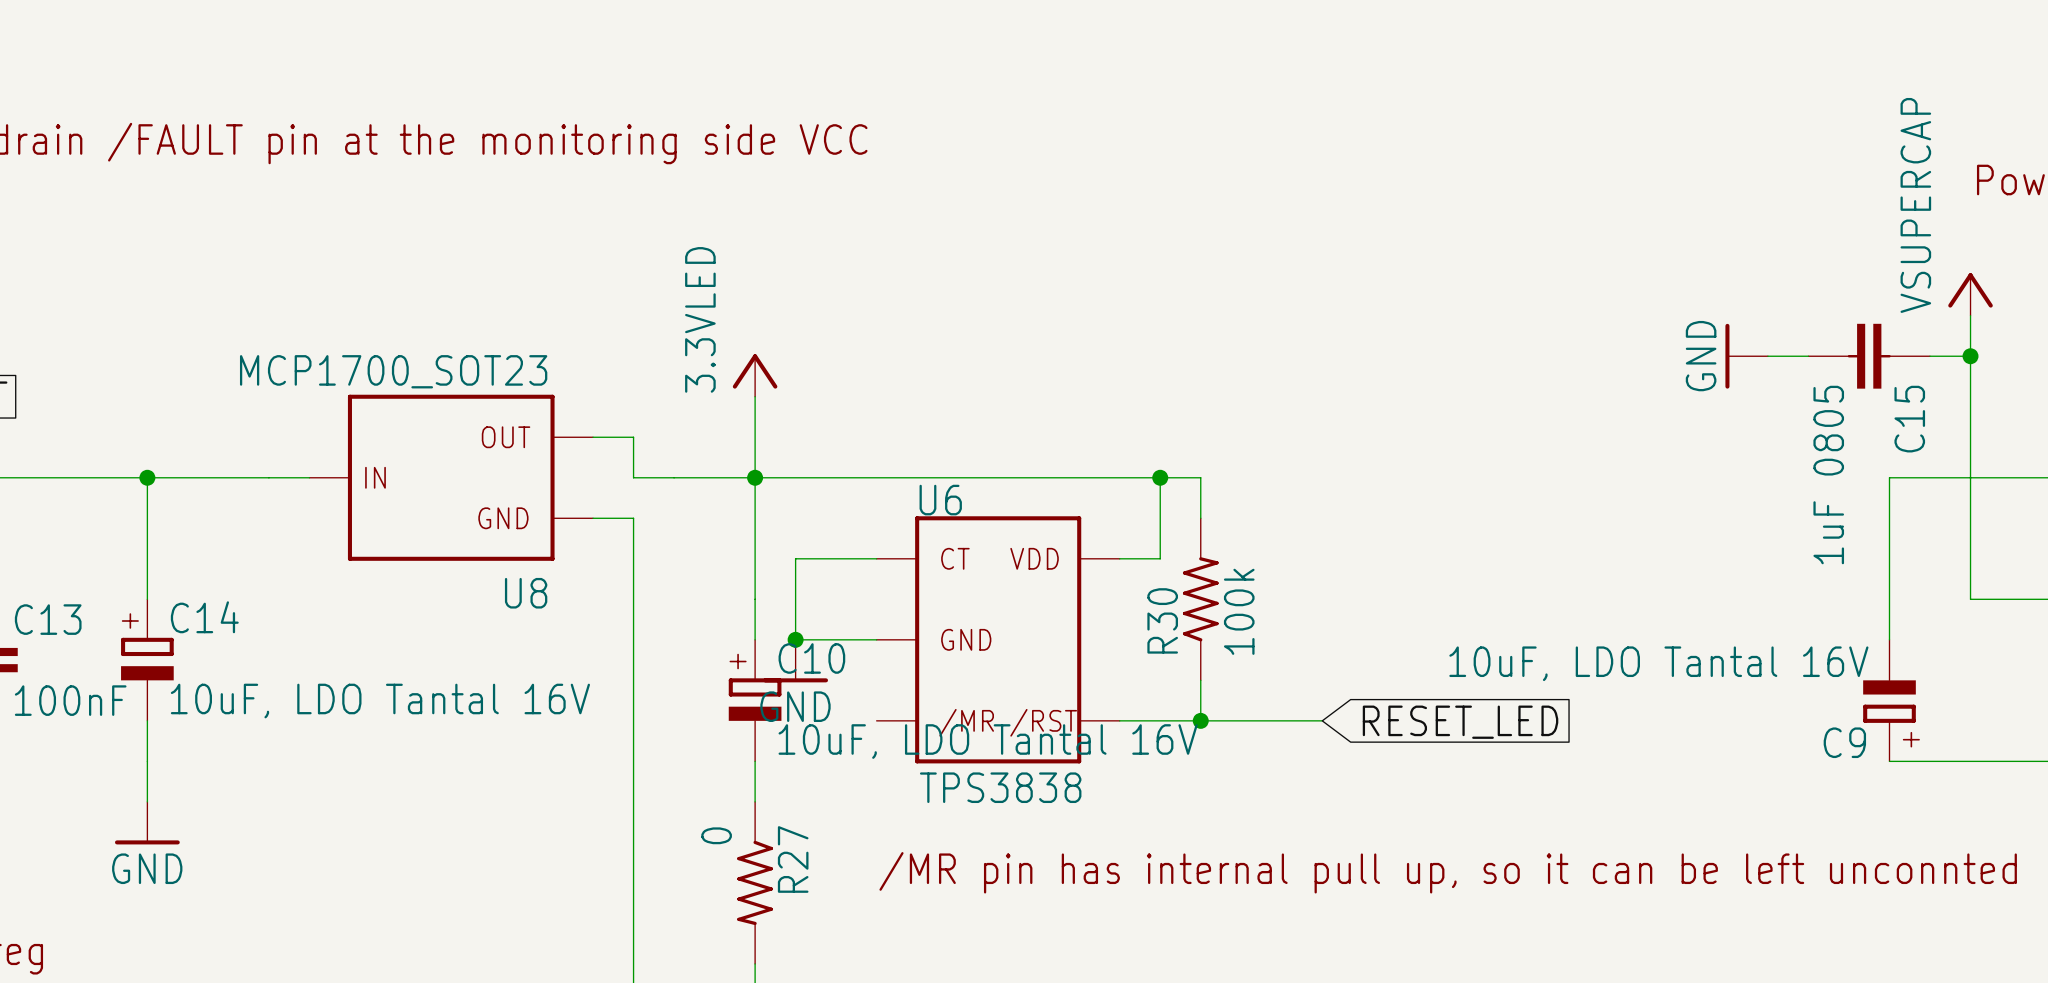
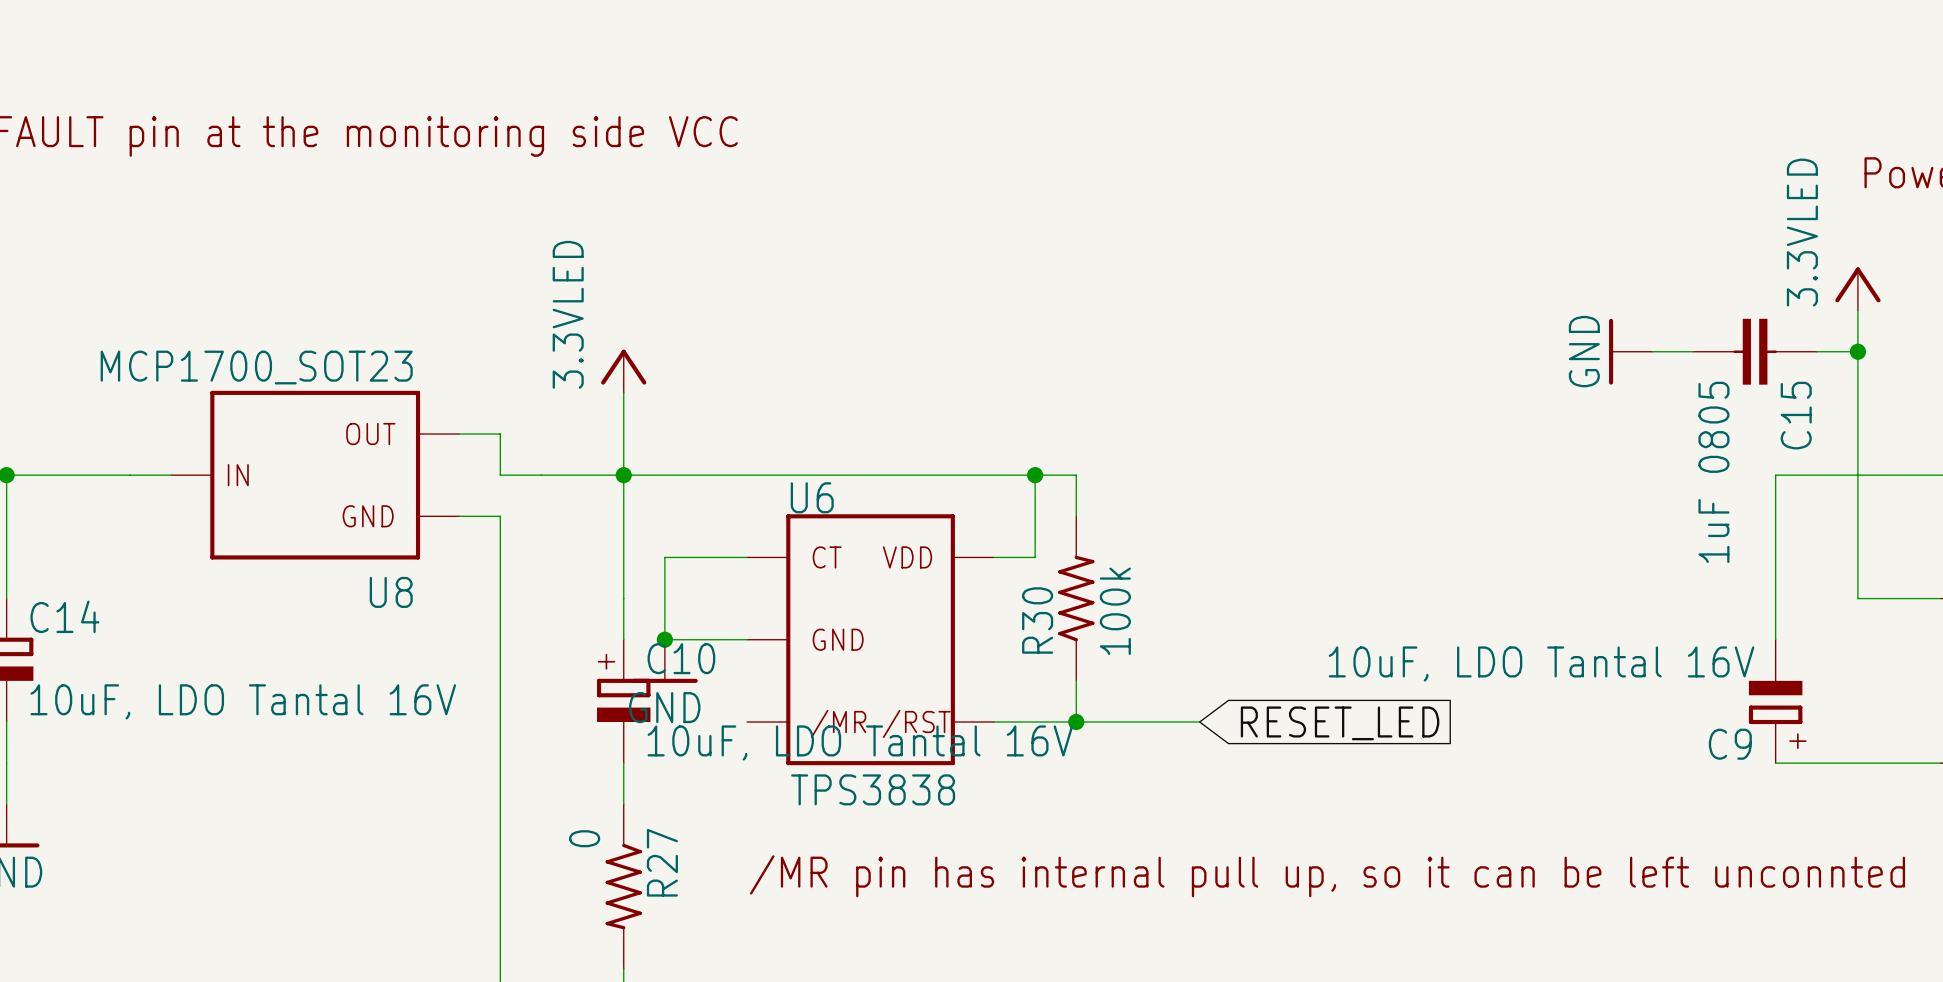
power symbol: VSUPERCAP (1970, 294) -> 3.3VLED (1857, 289)

